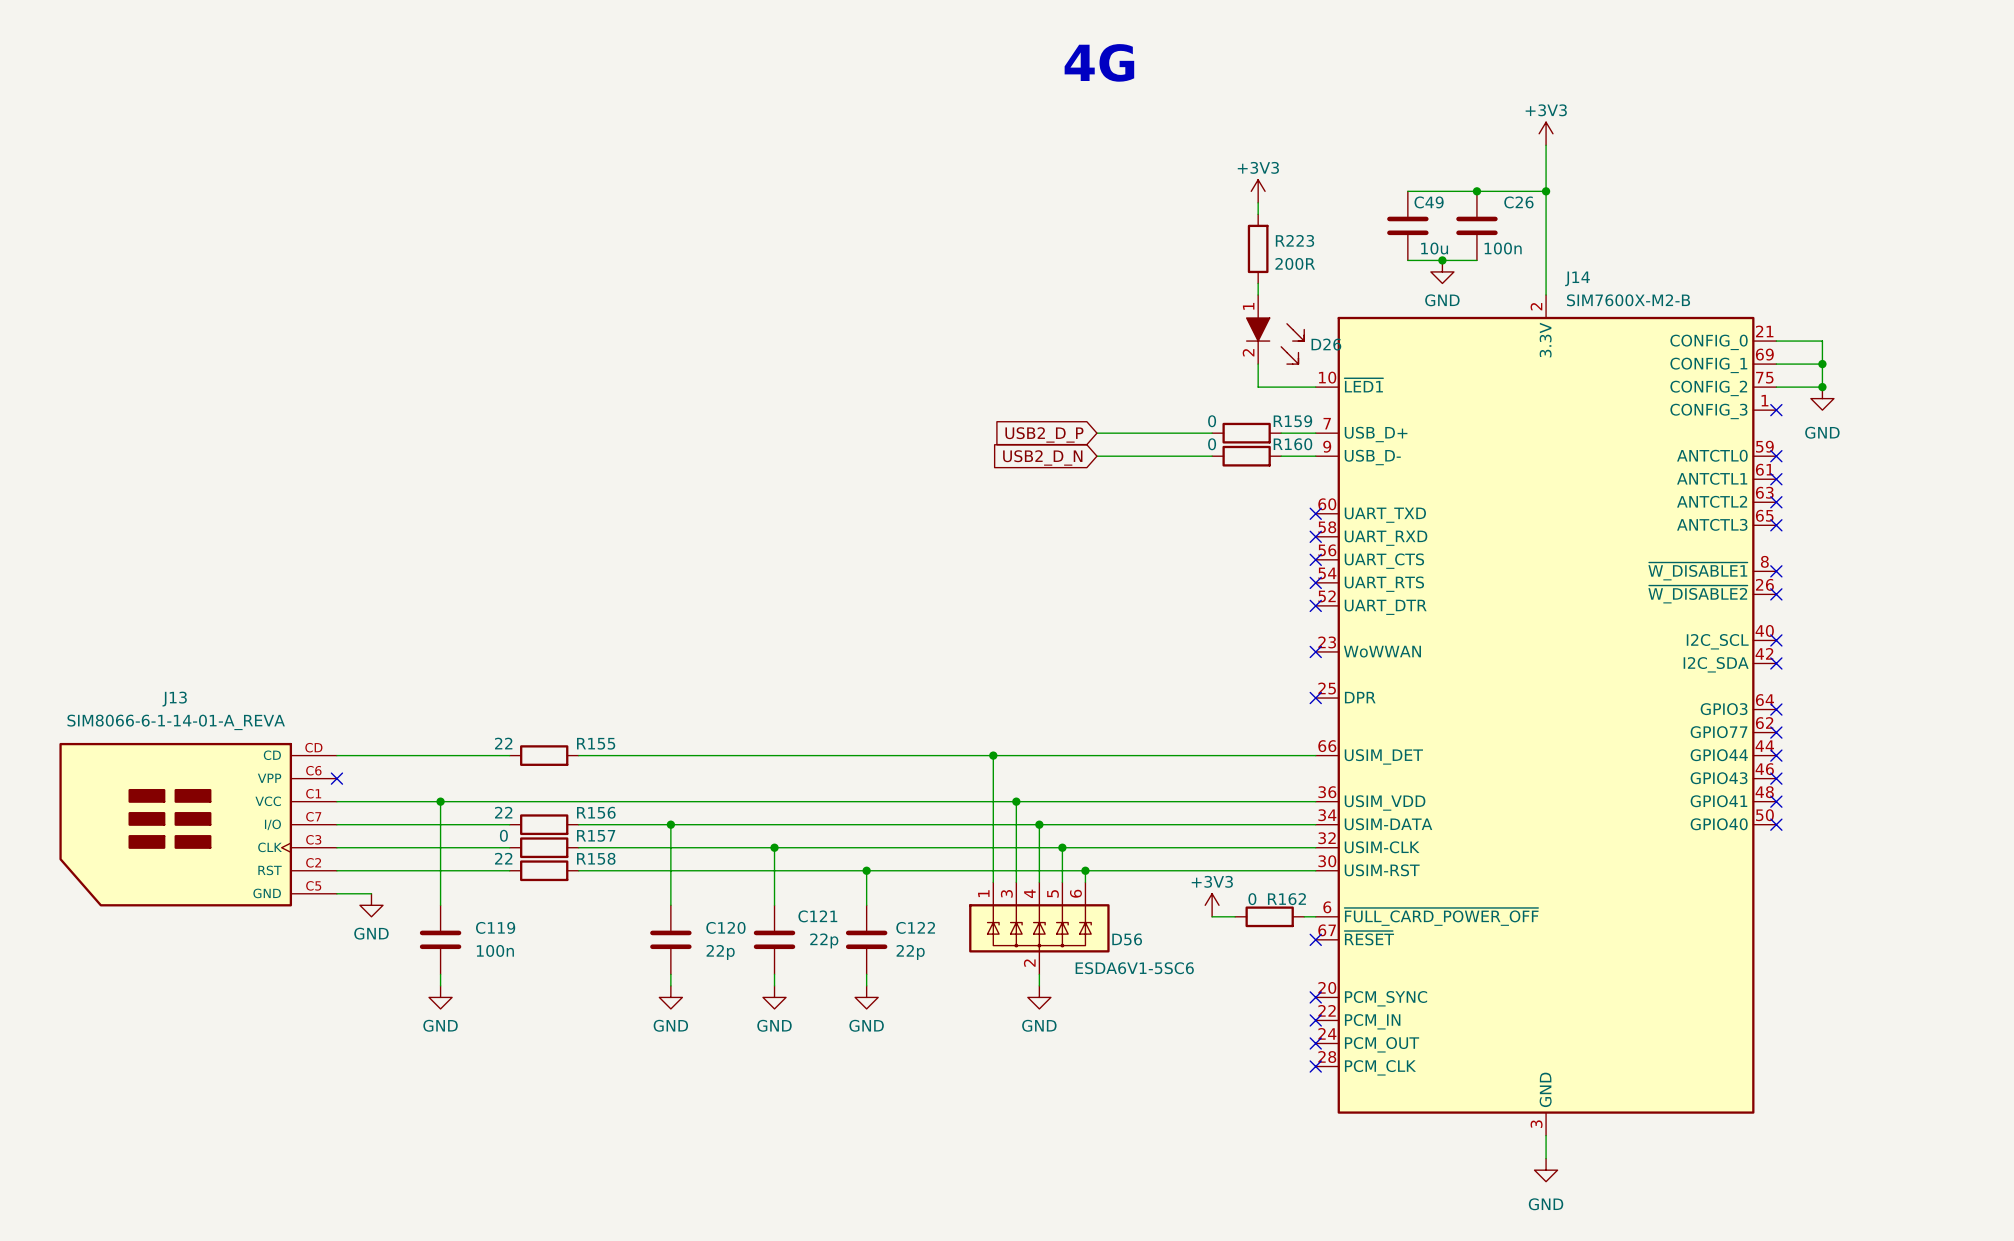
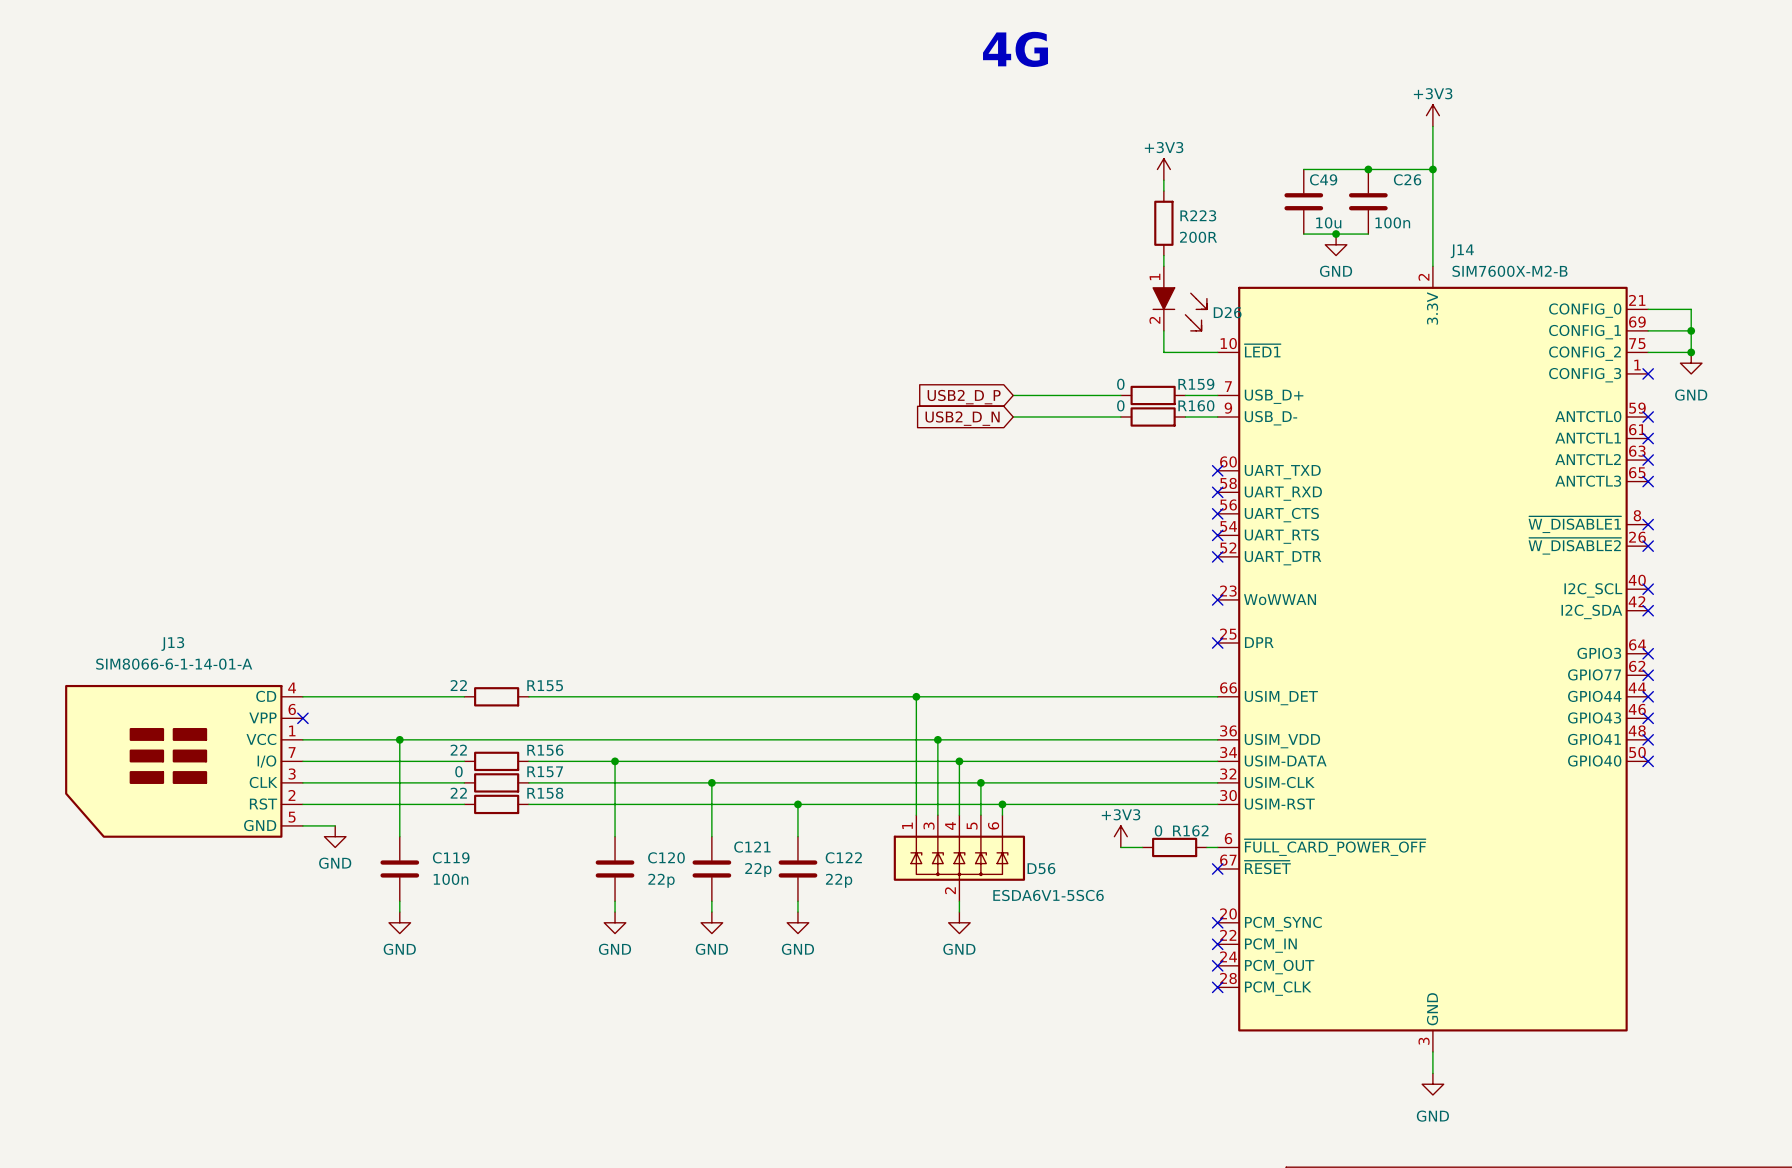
J13 value: SIM8066-6-1-14-01-A_REVA (176, 722) -> SIM8066-6-1-14-01-A (174, 664)
J13 symbol: [59, 742, 337, 907] -> [65, 684, 303, 838]

